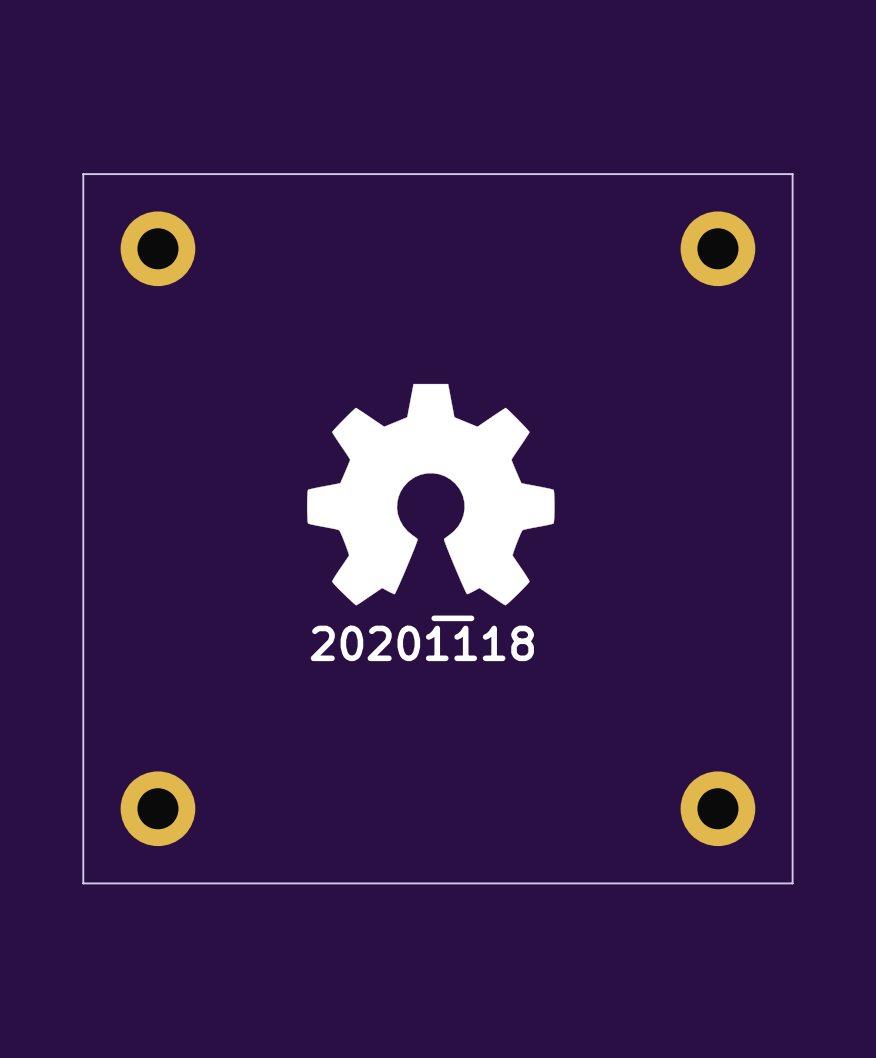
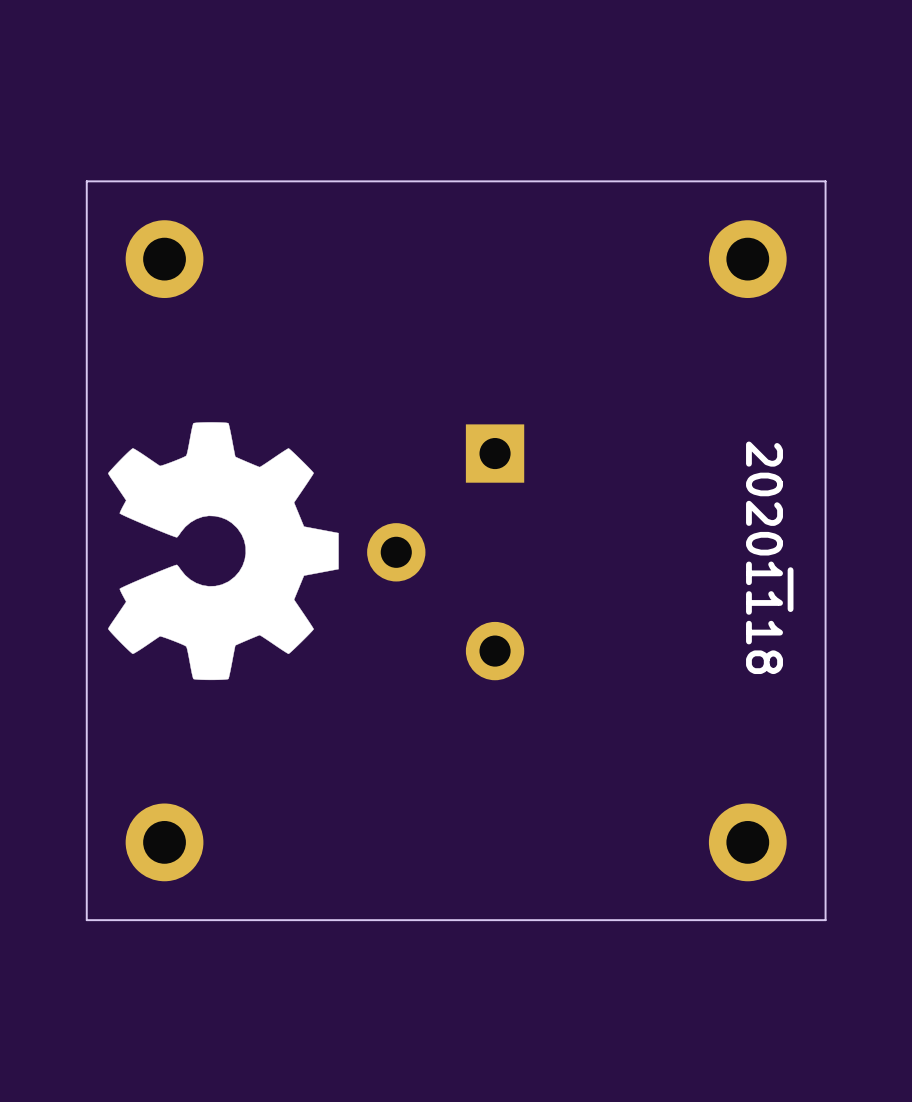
drawing: [307, 383, 555, 622] -> none
drawing: none -> [108, 422, 339, 681]
part: none -> (445, 552)
drawing: none -> [787, 567, 794, 612]

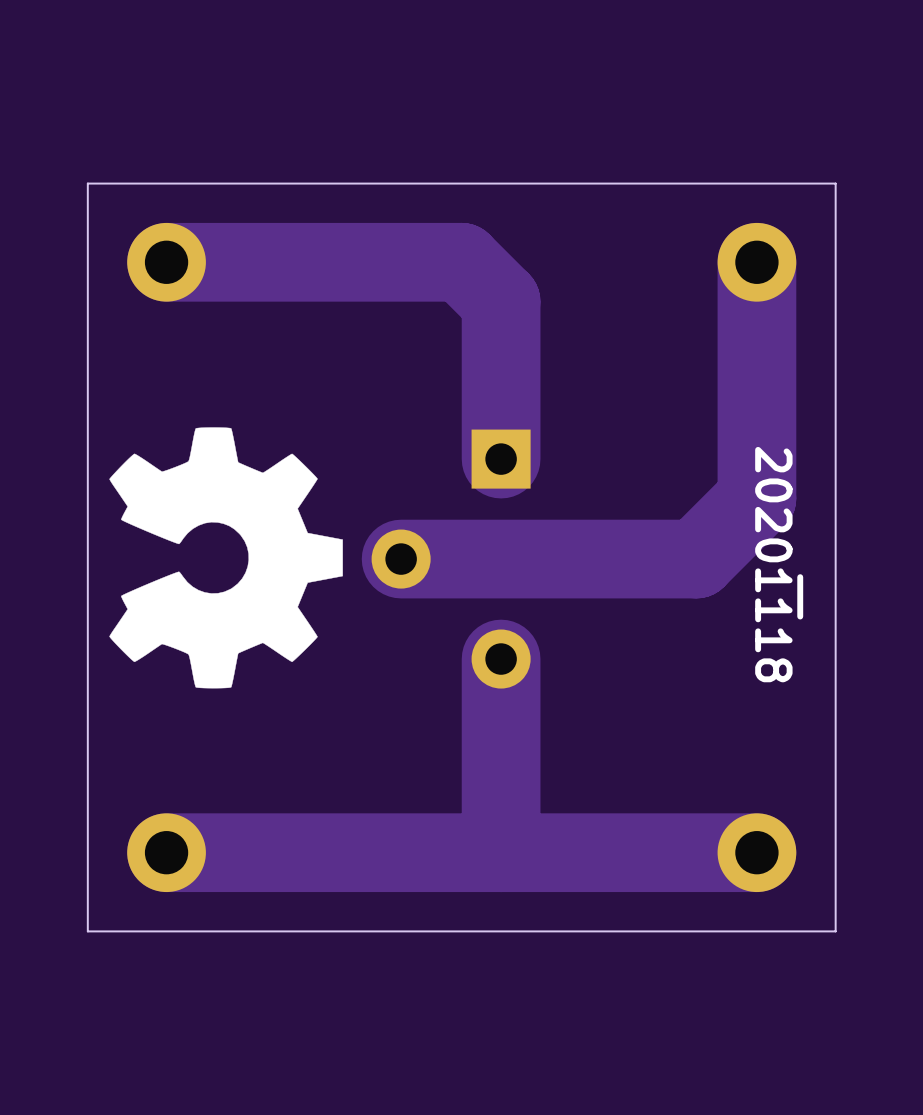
track: none -> (166, 262) (461, 262) (501, 301) (501, 459)
track: none -> (756, 262) (756, 498) (696, 559) (401, 559)
track: none -> (501, 659) (501, 852)
track: none -> (756, 852) (166, 852)

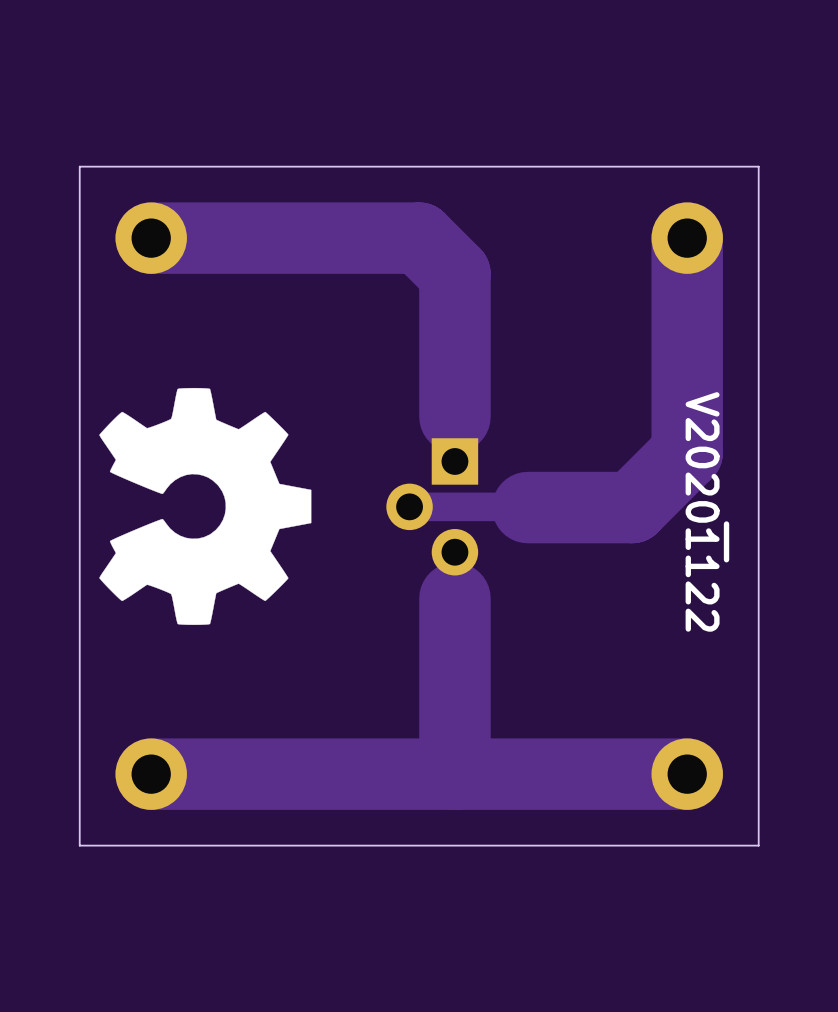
part footprint: [371, 429, 531, 689] -> [386, 438, 479, 576]
drawing shape: [755, 446, 804, 683] -> [685, 392, 730, 632]
track: (581, 559) (401, 559) -> (527, 507) (409, 506)

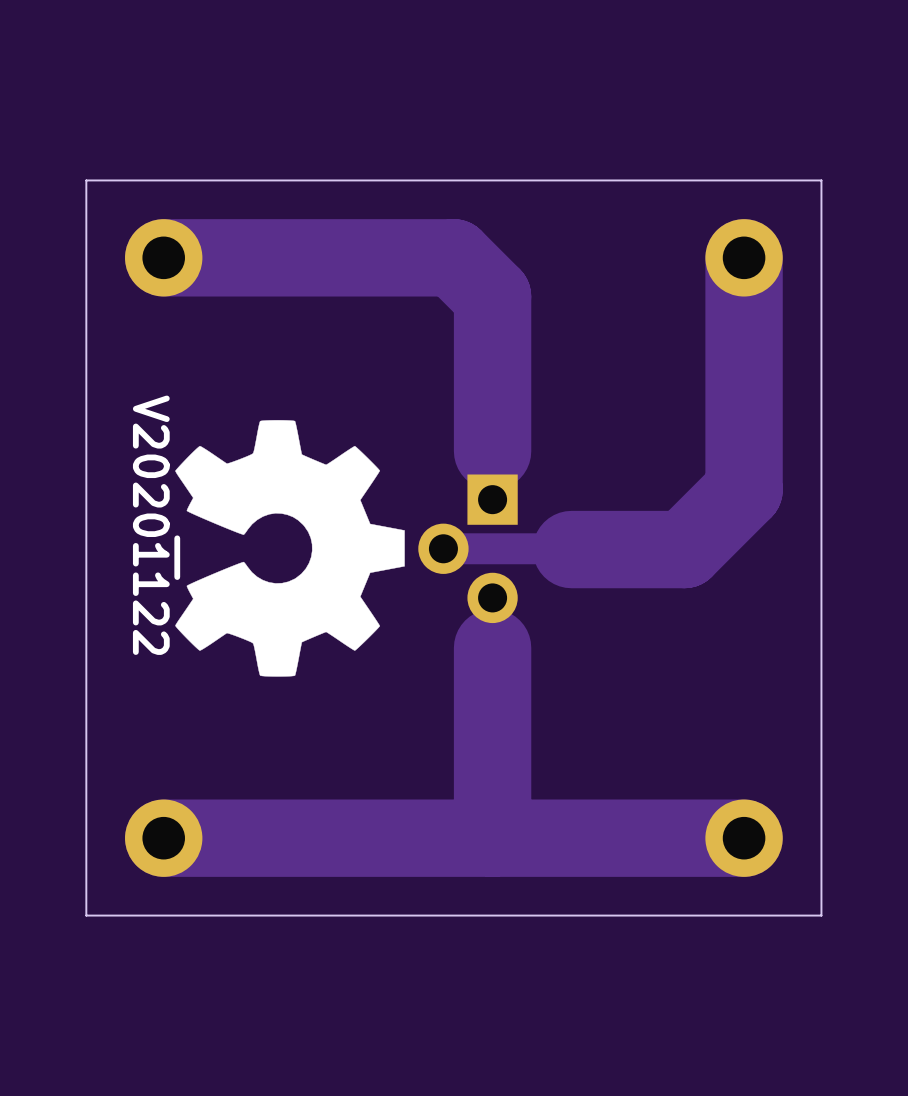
drawing position: (205, 506) -> (289, 548)
drawing position: (726, 541) -> (177, 557)

